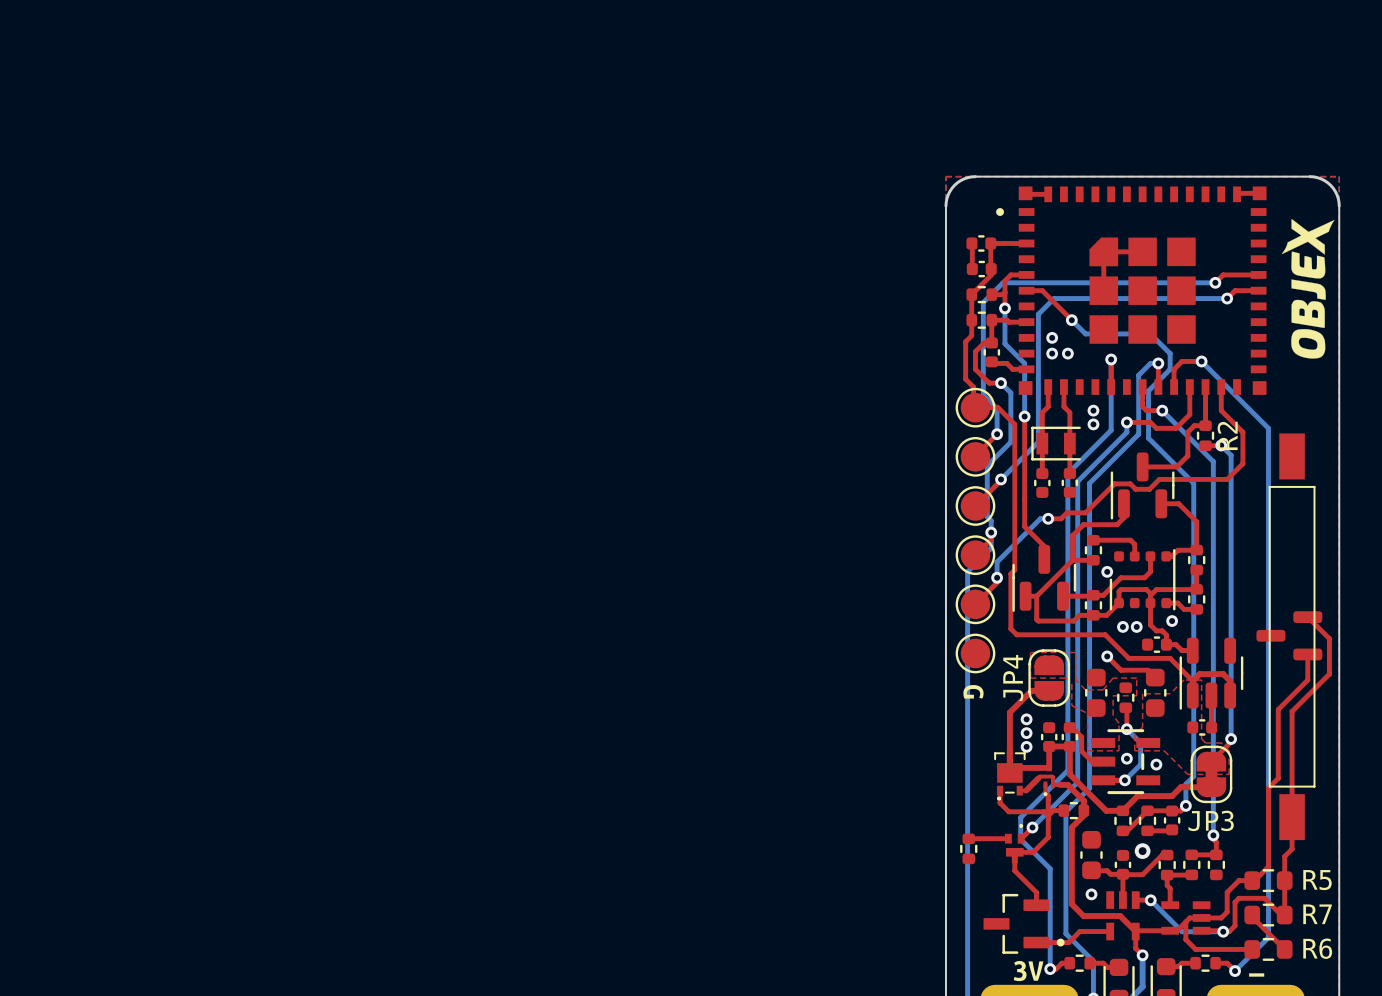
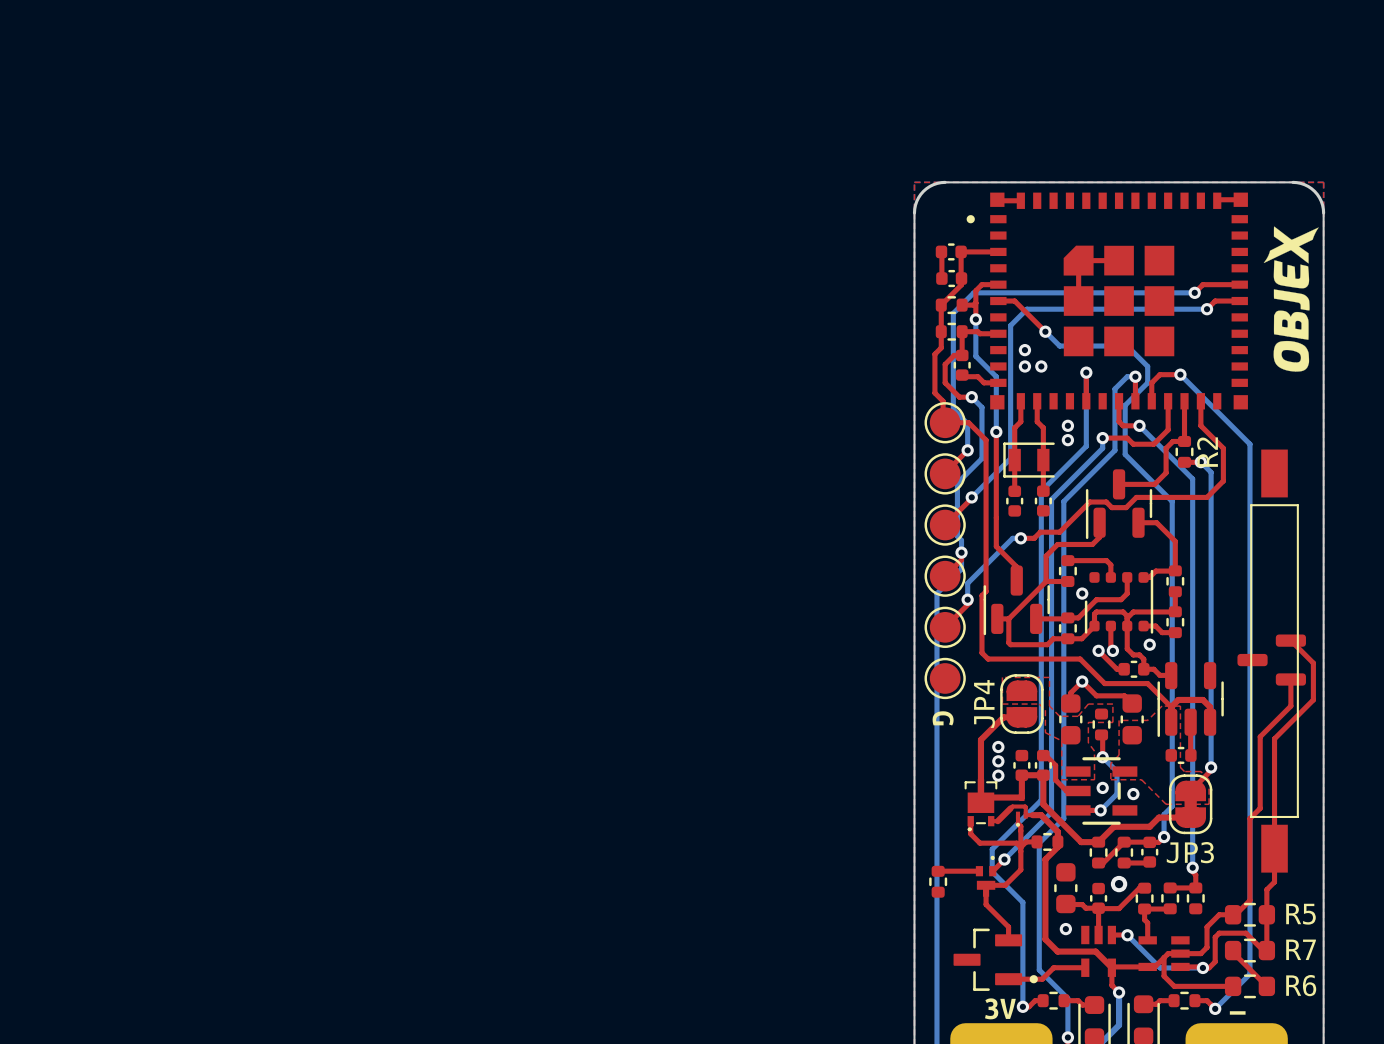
top track: none -> (1110, 626) (1110, 648) (1112, 650)
top track: none -> (1098, 650) (1117, 669) (1124, 669)
top track: none -> (1082, 681) (1070, 692) (1070, 703)

